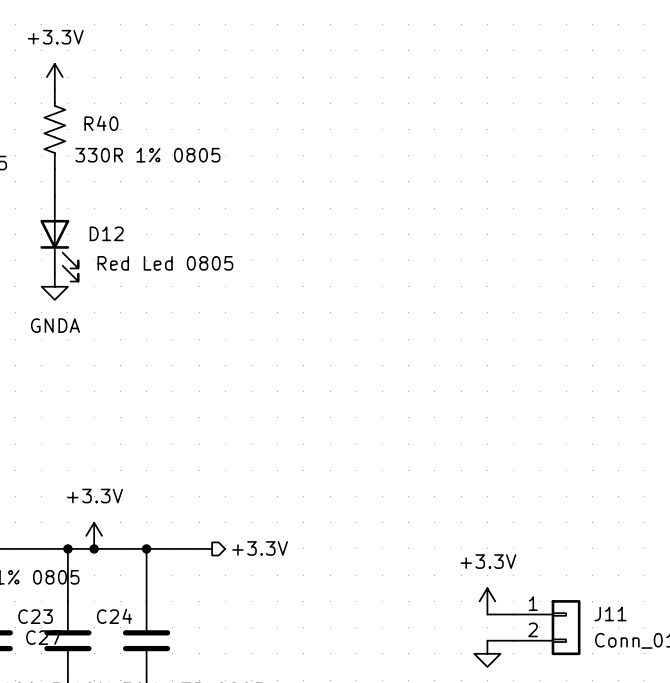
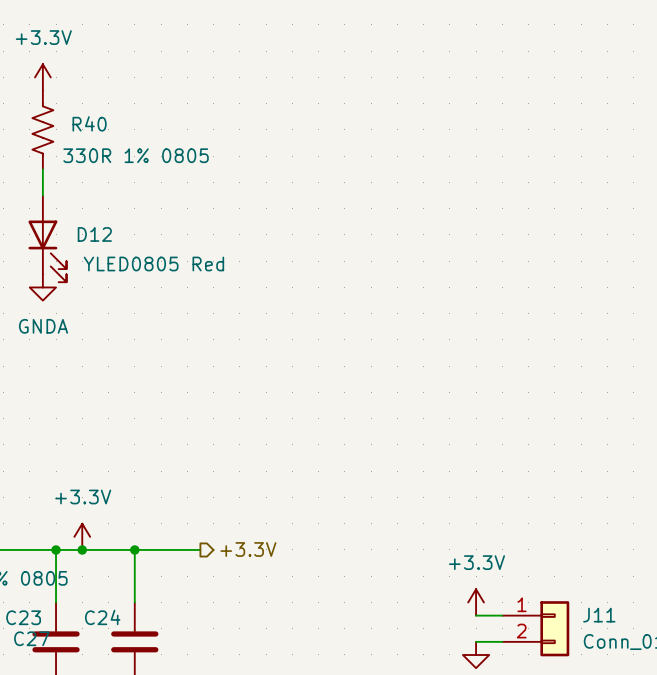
D12 value: Red Led 0805 (165, 263) -> YLED0805 Red (153, 263)

